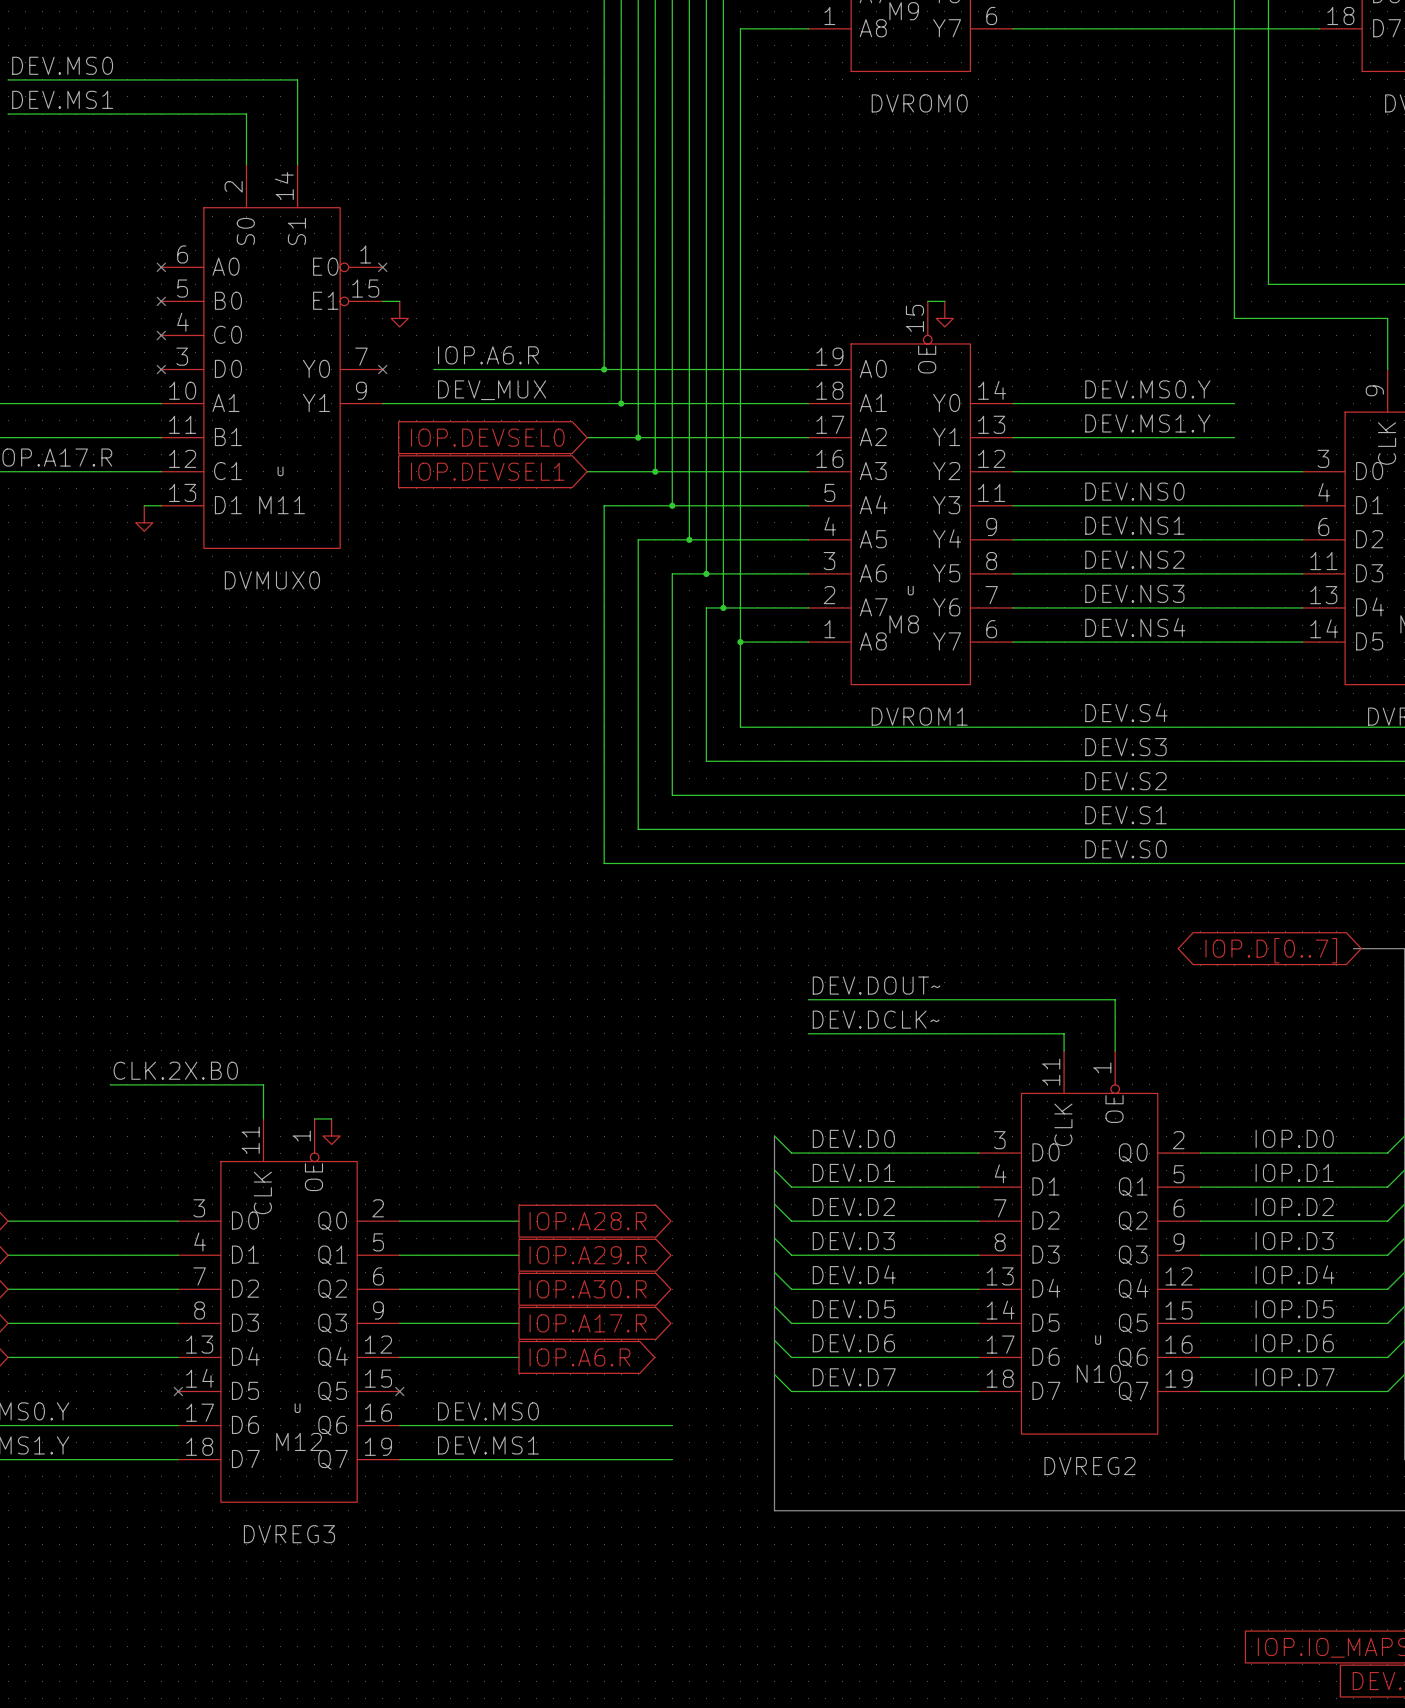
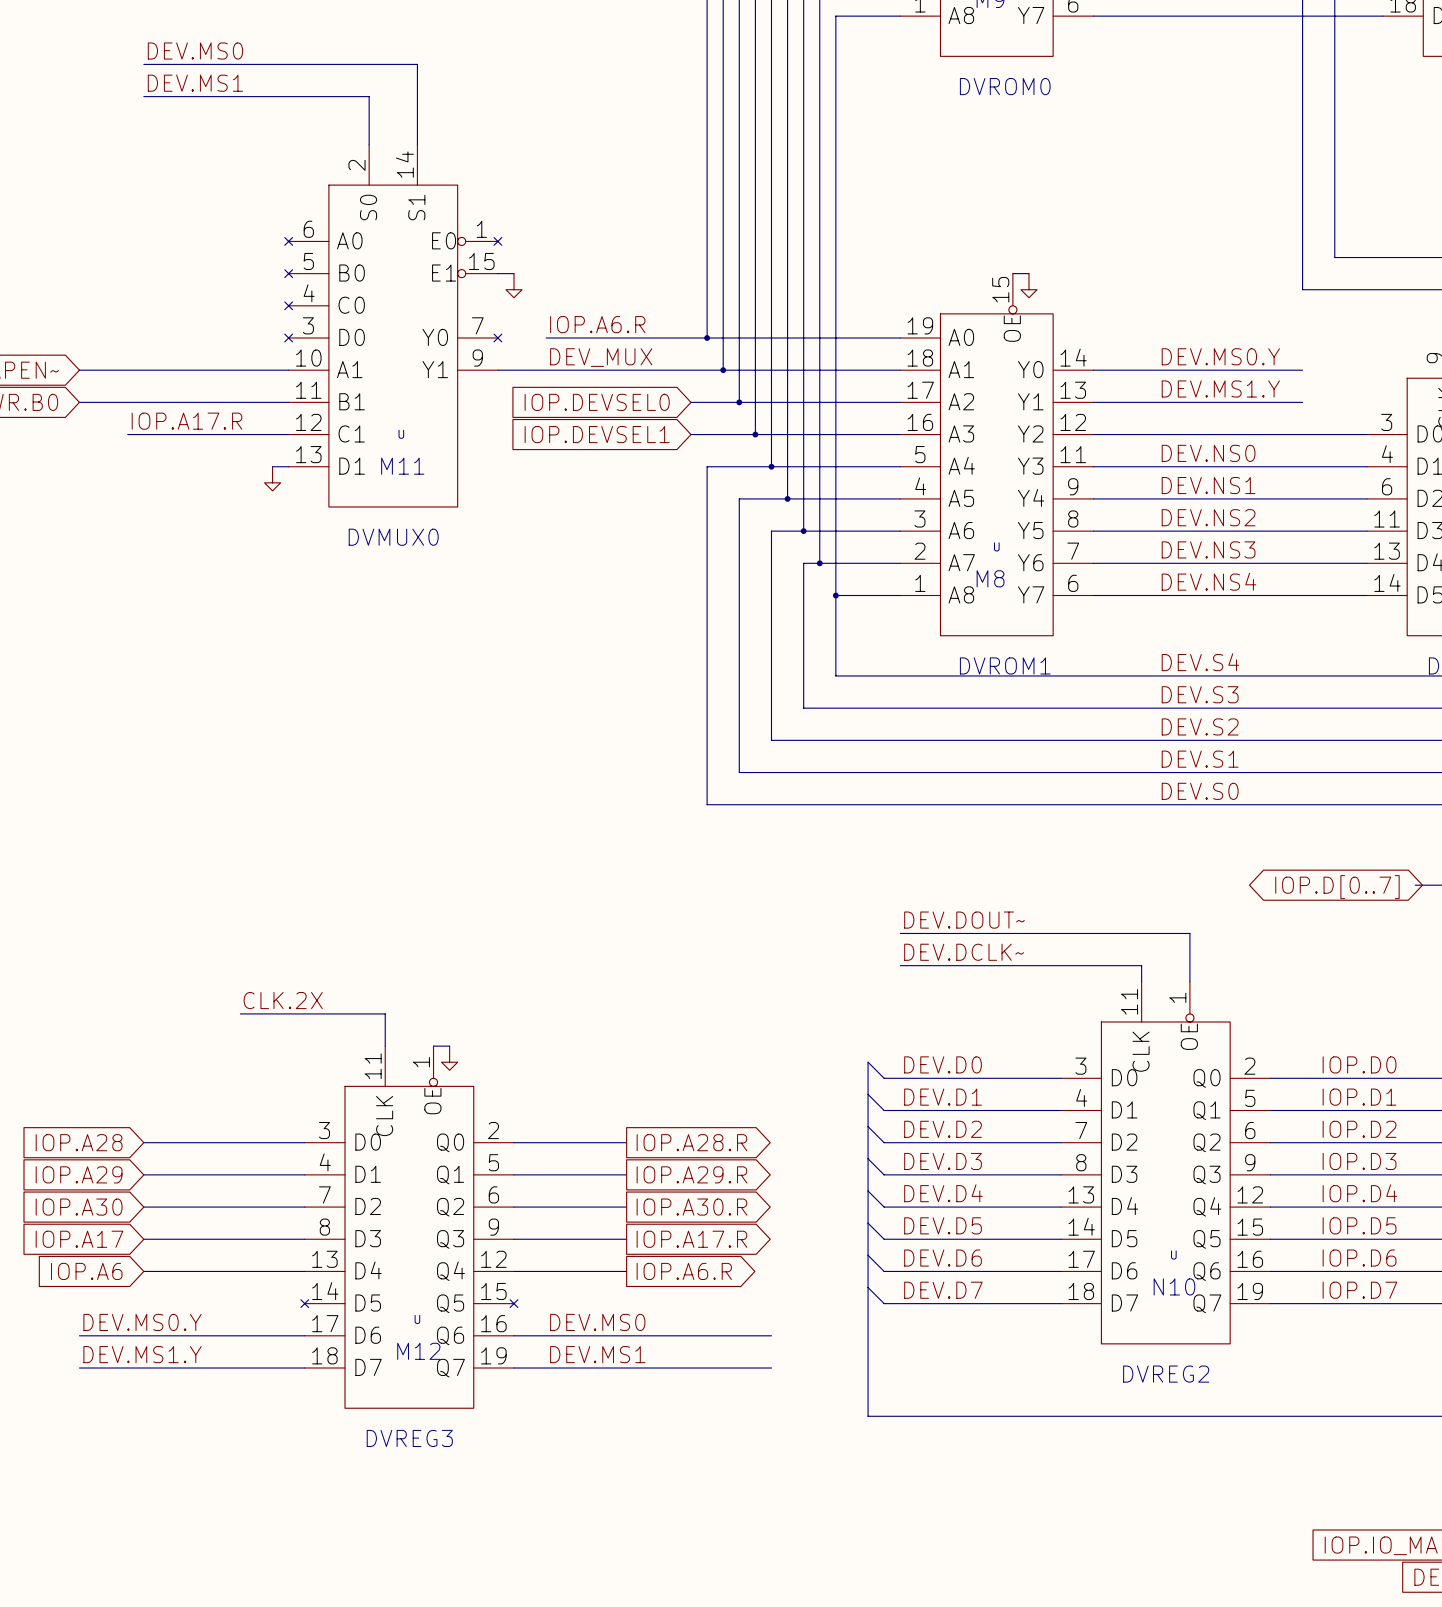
label: CLK.2X.B0 (175, 1070) -> CLK.2X (283, 1000)

